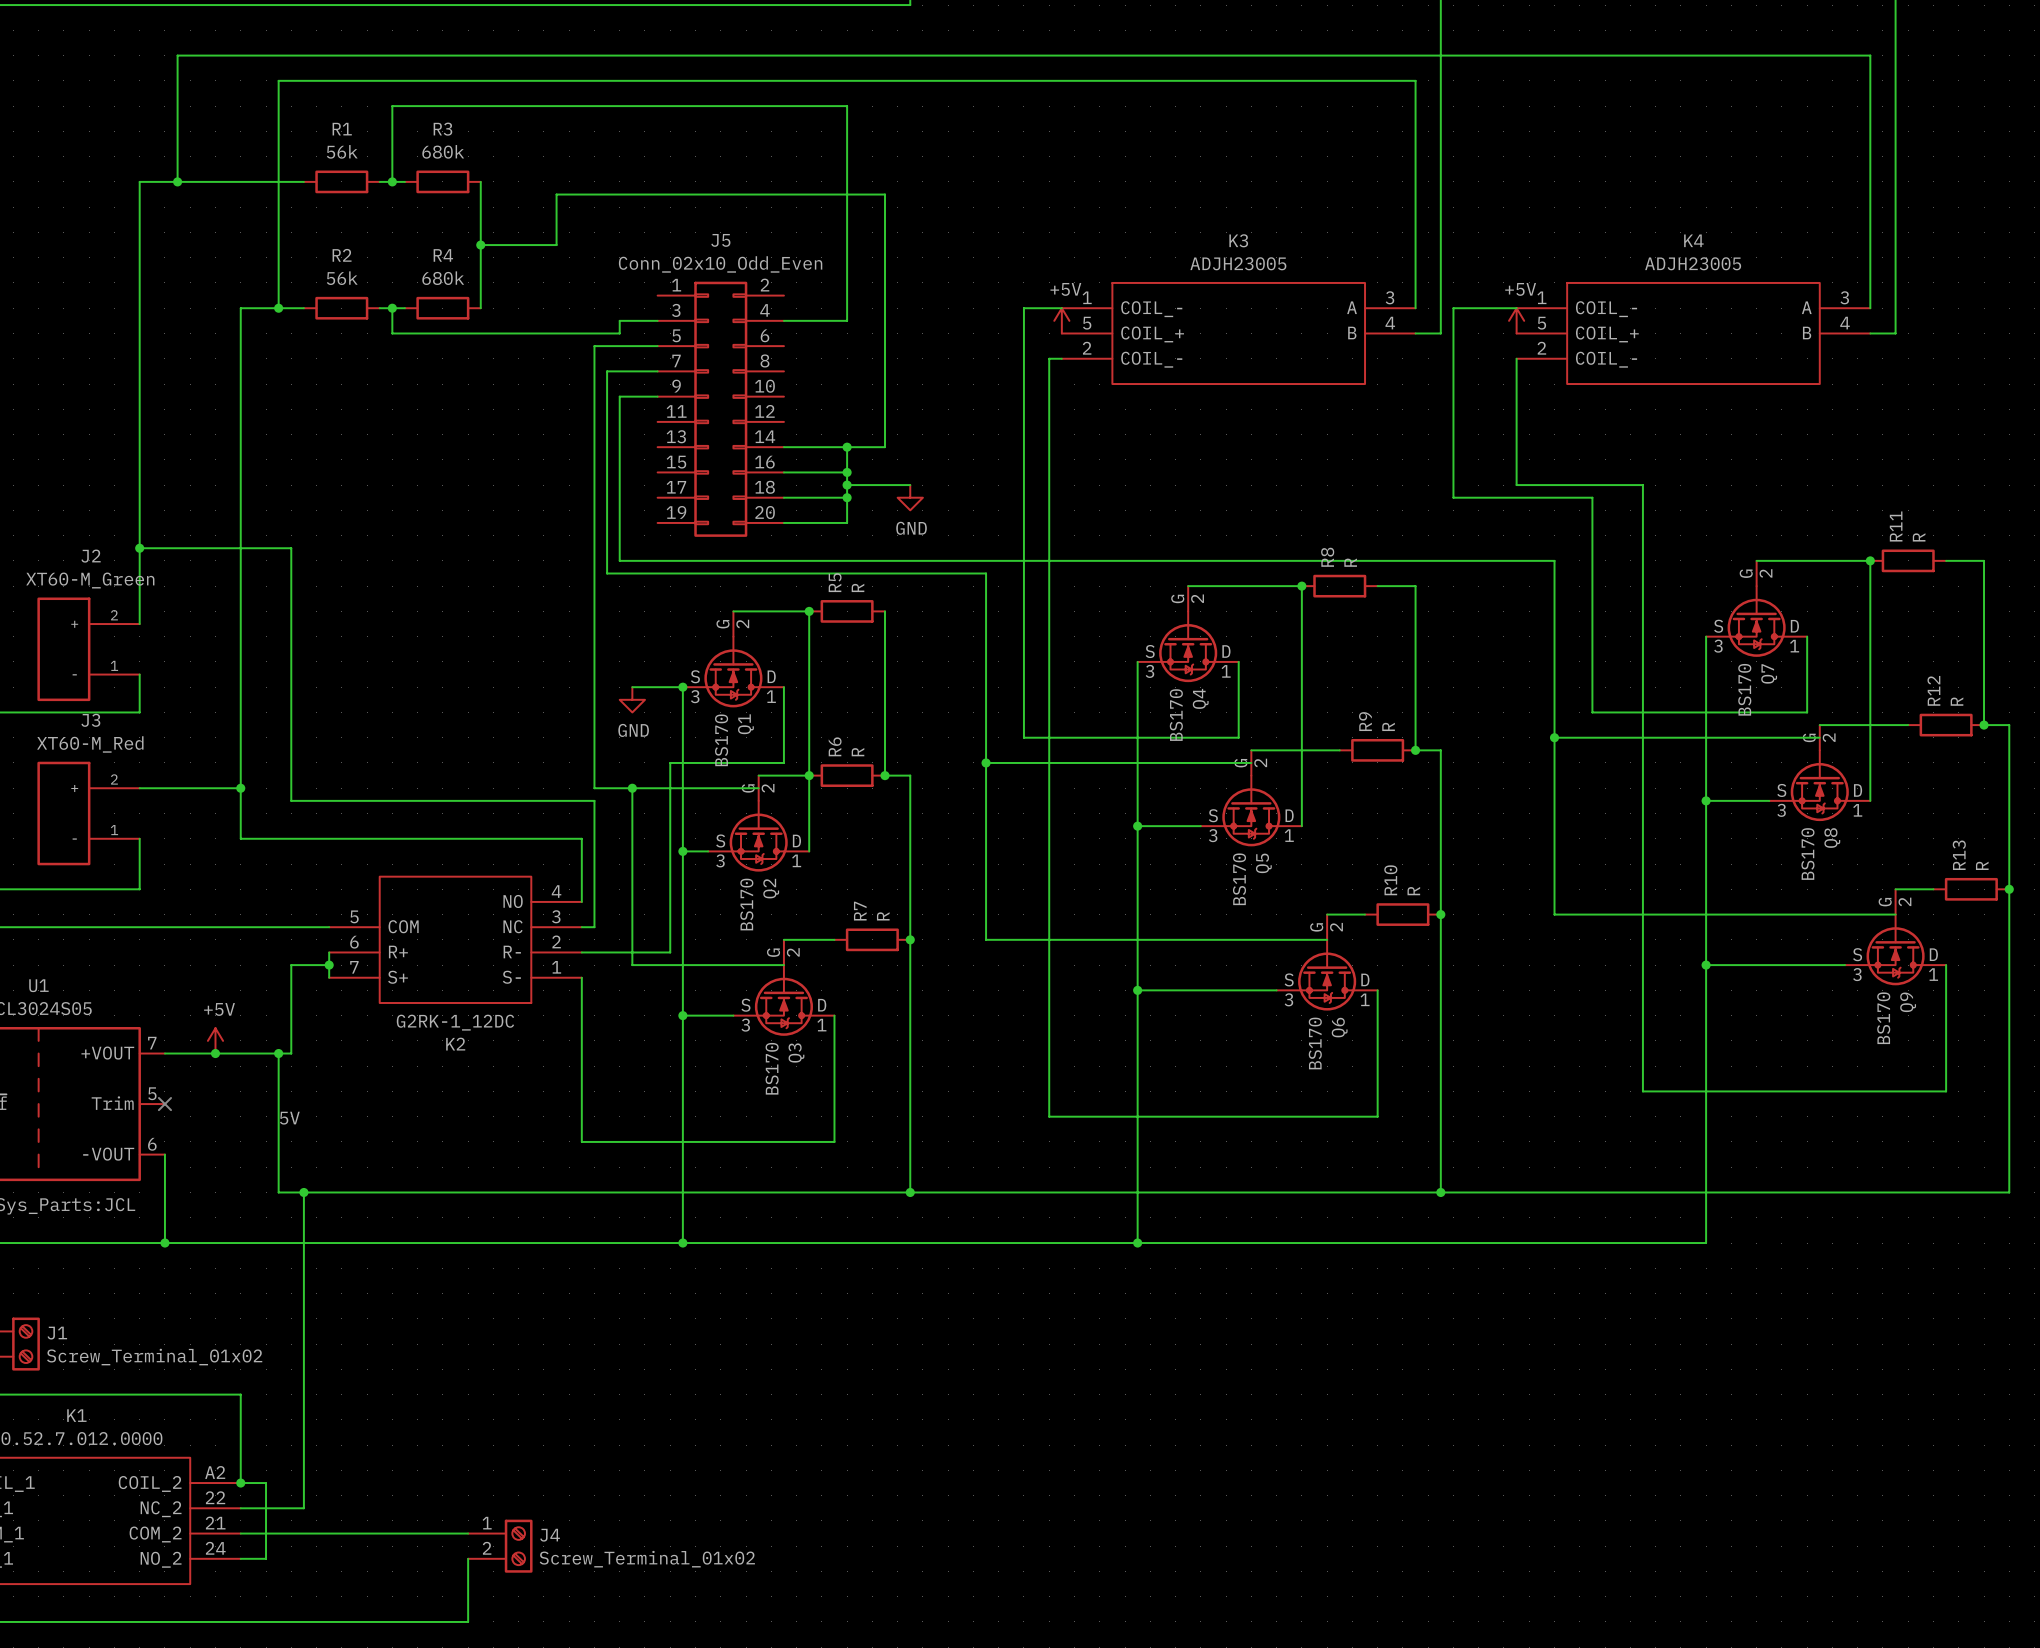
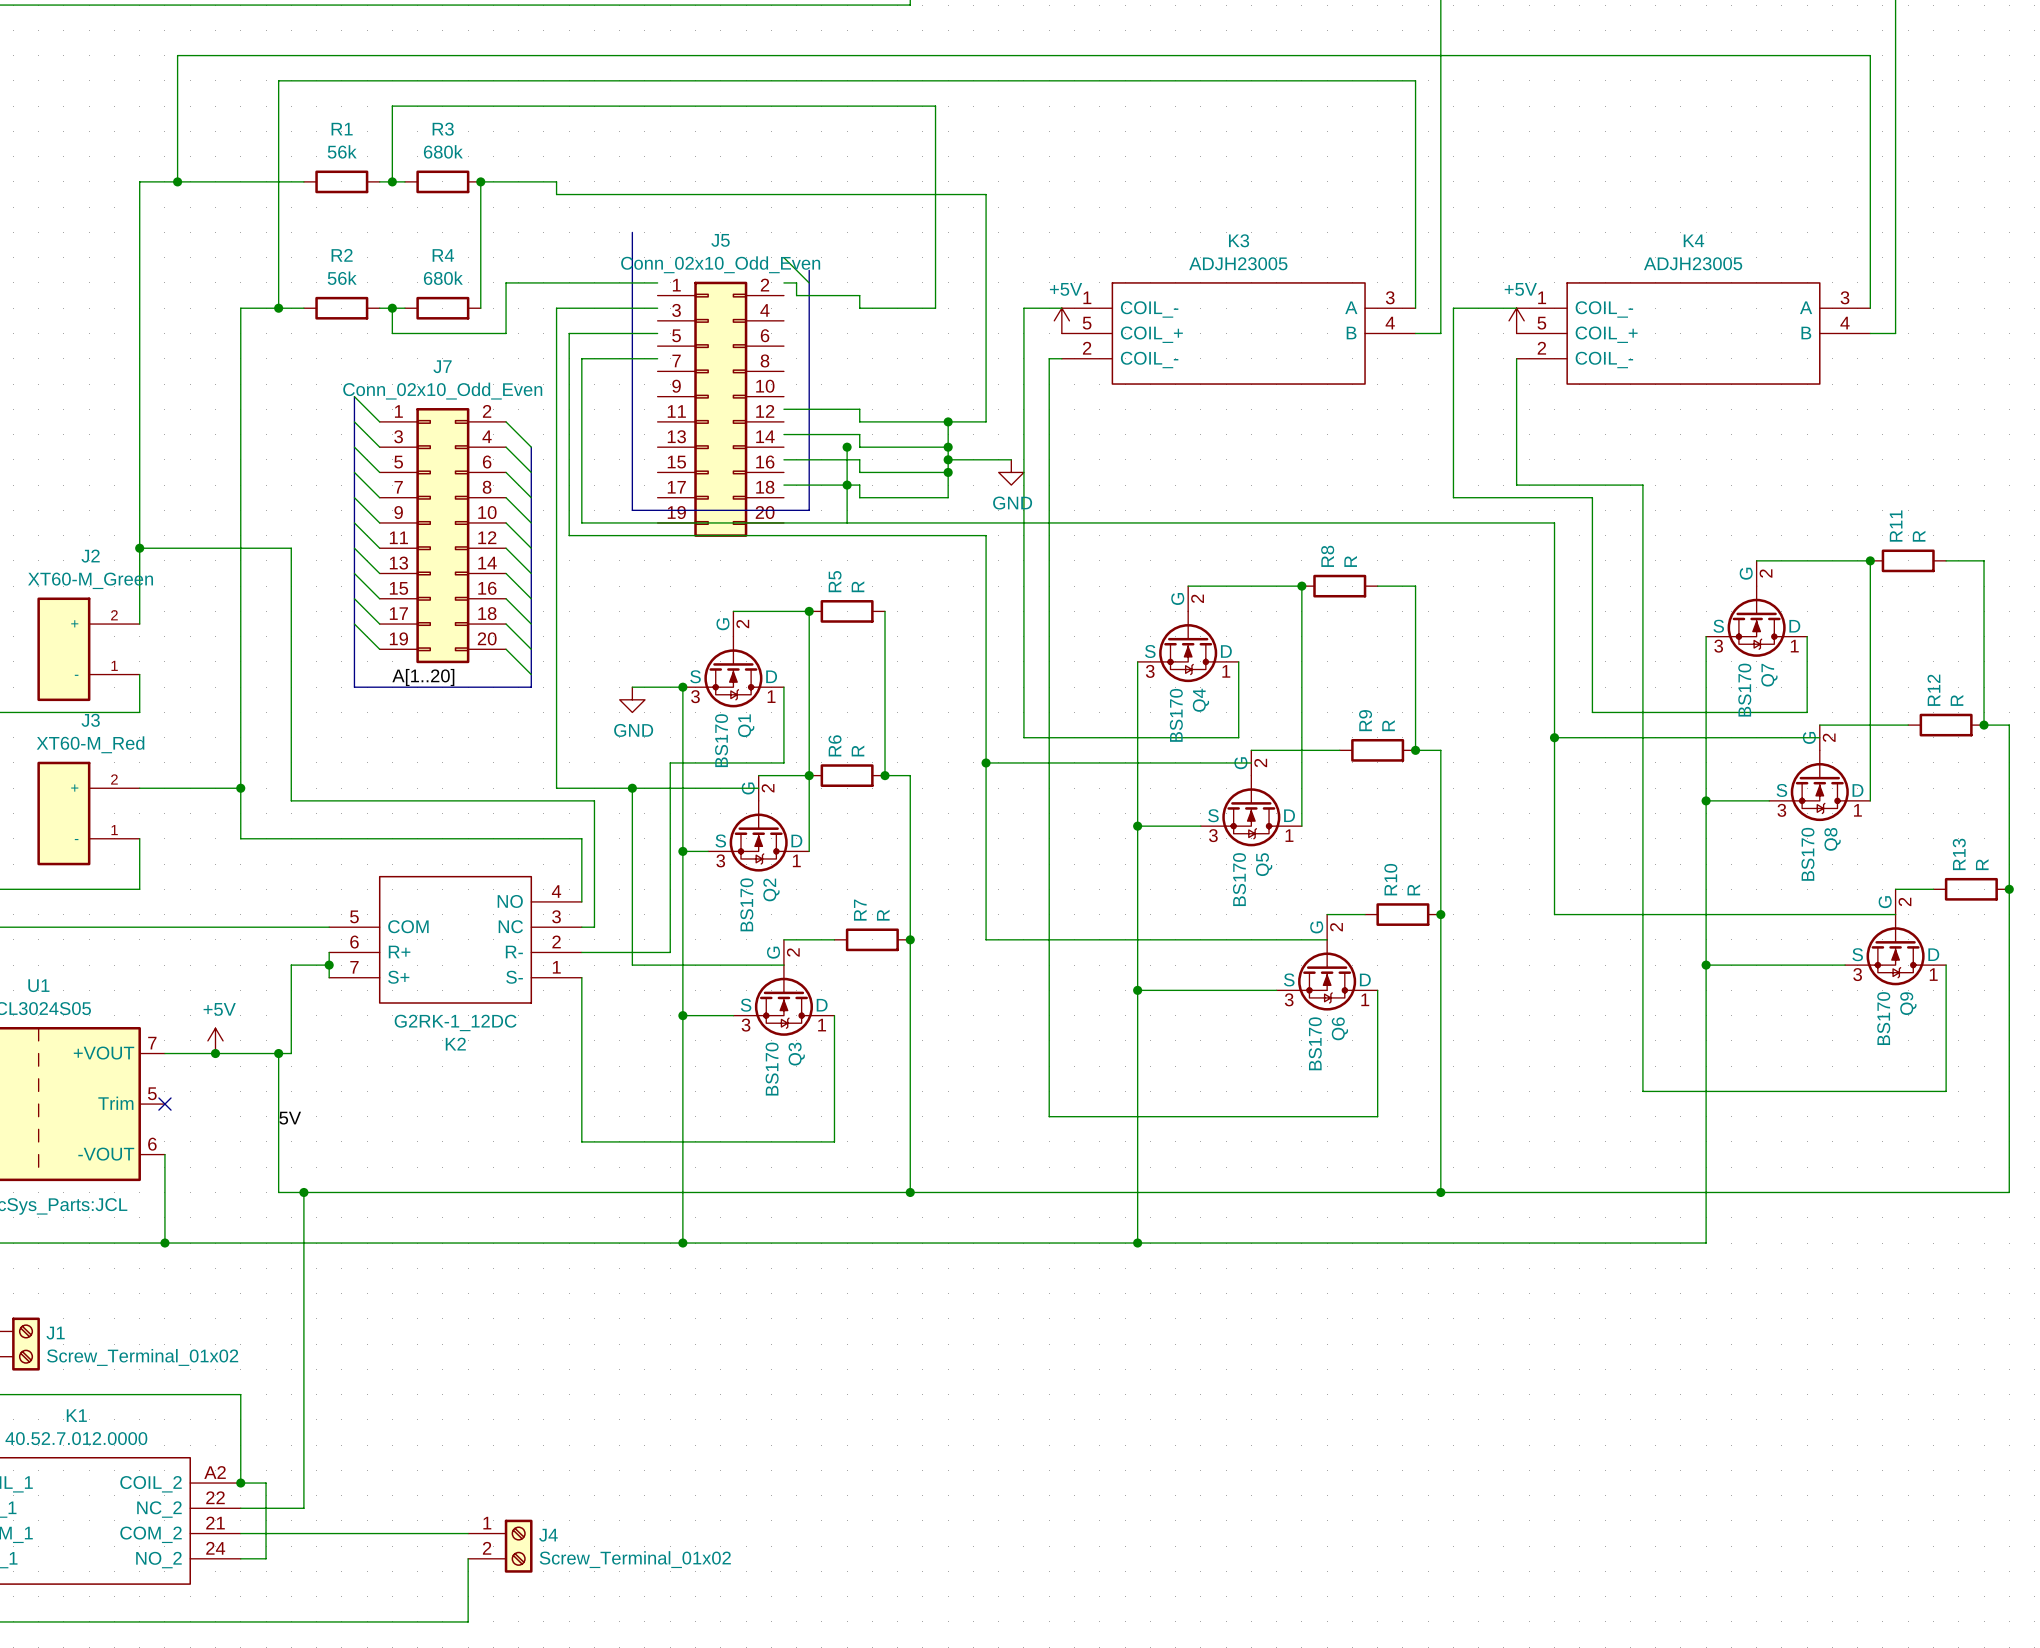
wire: (847, 106) (847, 320) (783, 320) -> (847, 106) (935, 106) (935, 308) (859, 308) (859, 295) (796, 295) (796, 282) (783, 282)
junction: none -> (480, 181)
wire: (556, 194) (556, 245) (480, 245) -> (556, 194) (556, 181) (480, 181)
wire: (885, 194) (885, 447) -> (885, 194) (986, 194) (986, 421) (859, 421) (859, 409) (783, 409)
bus: none -> (632, 232) (632, 510) (809, 510) (809, 270)
junction: (480, 245) -> none
wire: none -> (783, 257) (809, 282)
wire: (657, 320) (619, 320) (619, 333) -> (657, 333) (619, 333)
wire: (506, 333) (569, 333) -> (506, 333) (506, 282) (657, 282)
wire: (657, 346) (594, 346) (594, 788) -> (657, 308) (556, 308) (556, 788) (594, 788)
wire: none -> (657, 358) (581, 358) (581, 522) (783, 522)
wire: (657, 371) (607, 371) (607, 573) (986, 573) -> (569, 333) (569, 535) (986, 535) (986, 573)
wire: none -> (354, 396) (379, 421)
bus: none -> (354, 396) (354, 687) (531, 687) (531, 447)
wire: (657, 396) (619, 396) (619, 560) (1554, 560) -> (847, 522) (1554, 522) (1554, 560)
wire: none -> (354, 421) (379, 447)
wire: none -> (506, 421) (531, 447)
junction: none -> (948, 421)
wire: none -> (354, 447) (379, 472)
wire: none -> (506, 447) (531, 472)
wire: (783, 447) (859, 447) -> (783, 434) (859, 434) (859, 447)
junction: none -> (948, 447)
wire: none -> (783, 459) (859, 459) (859, 472) (948, 472)
wire: none -> (948, 459) (1011, 459)
junction: none -> (948, 459)
wire: none -> (354, 472) (379, 497)
wire: none -> (506, 472) (531, 497)
wire: (783, 472) (847, 472) -> (783, 485) (847, 485)
junction: (847, 472) -> none
junction: none -> (948, 472)
wire: (859, 485) (910, 485) -> (859, 485) (859, 497) (948, 497) (948, 421)
wire: none -> (354, 497) (379, 522)
wire: none -> (506, 497) (531, 522)
wire: (783, 497) (847, 497) -> (885, 447) (948, 447)
junction: (847, 497) -> none
power symbol position: GND (910, 497) -> GND (1011, 472)
wire: none -> (354, 522) (379, 548)
wire: none -> (506, 522) (531, 548)
J7: none -> Conn_02x10_Odd_Even (442, 535)
wire: none -> (354, 548) (379, 573)
wire: none -> (506, 548) (531, 573)
wire: none -> (354, 573) (379, 598)
wire: none -> (506, 573) (531, 598)
wire: none -> (354, 598) (379, 624)
wire: none -> (506, 598) (531, 624)
wire: none -> (354, 624) (379, 649)
wire: none -> (506, 624) (531, 649)
wire: none -> (506, 649) (531, 674)
label: none -> A[1..20] (423, 677)

